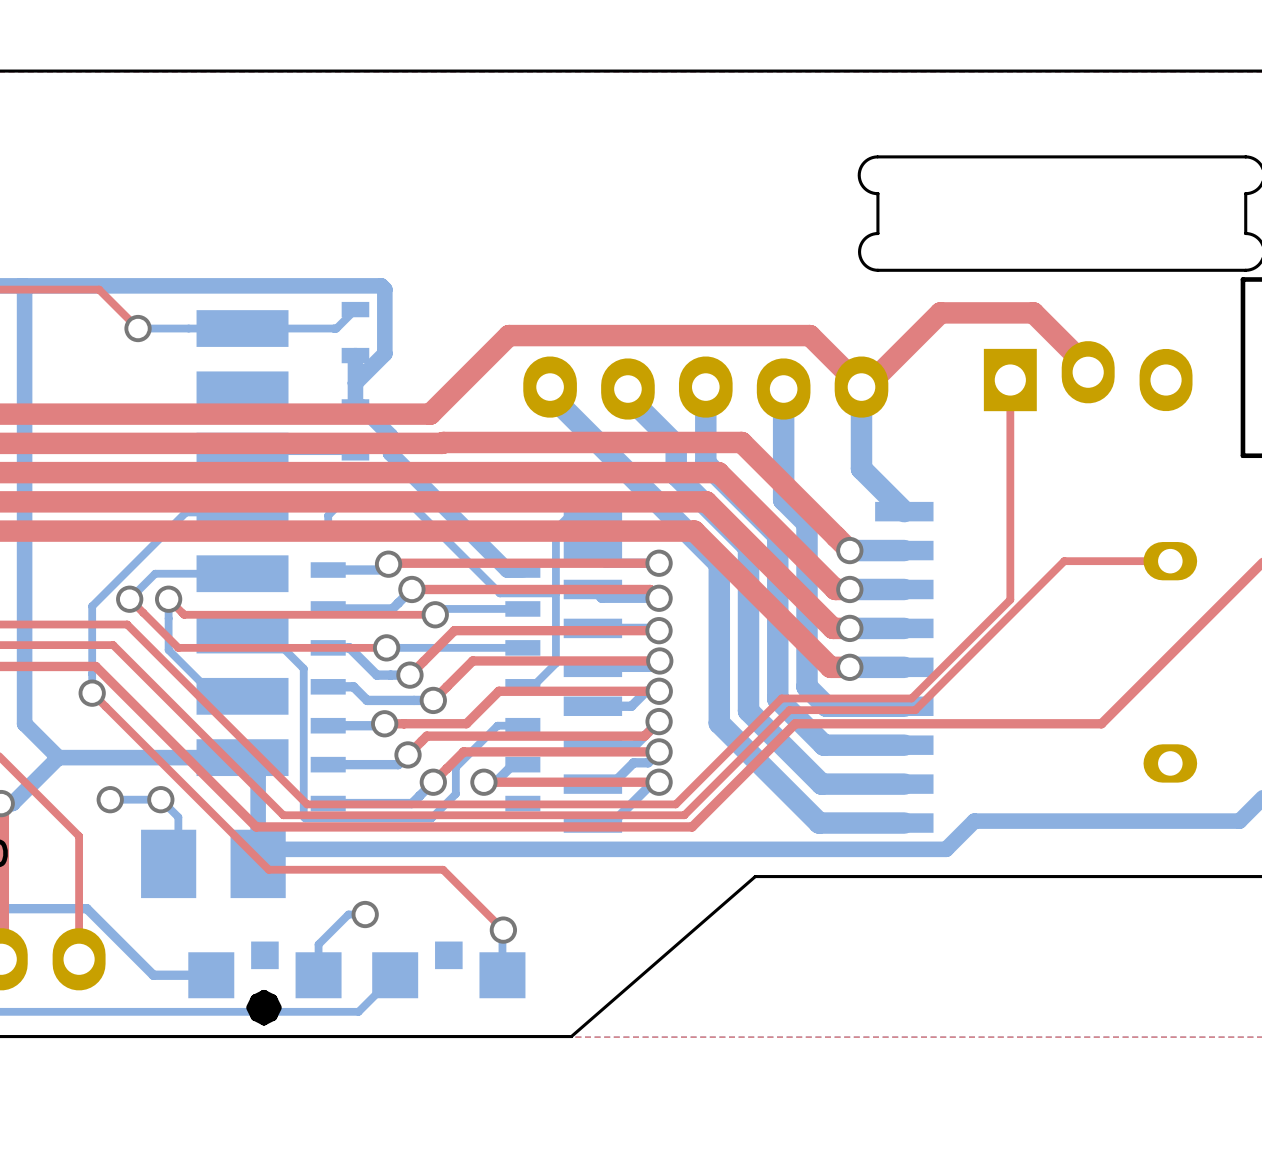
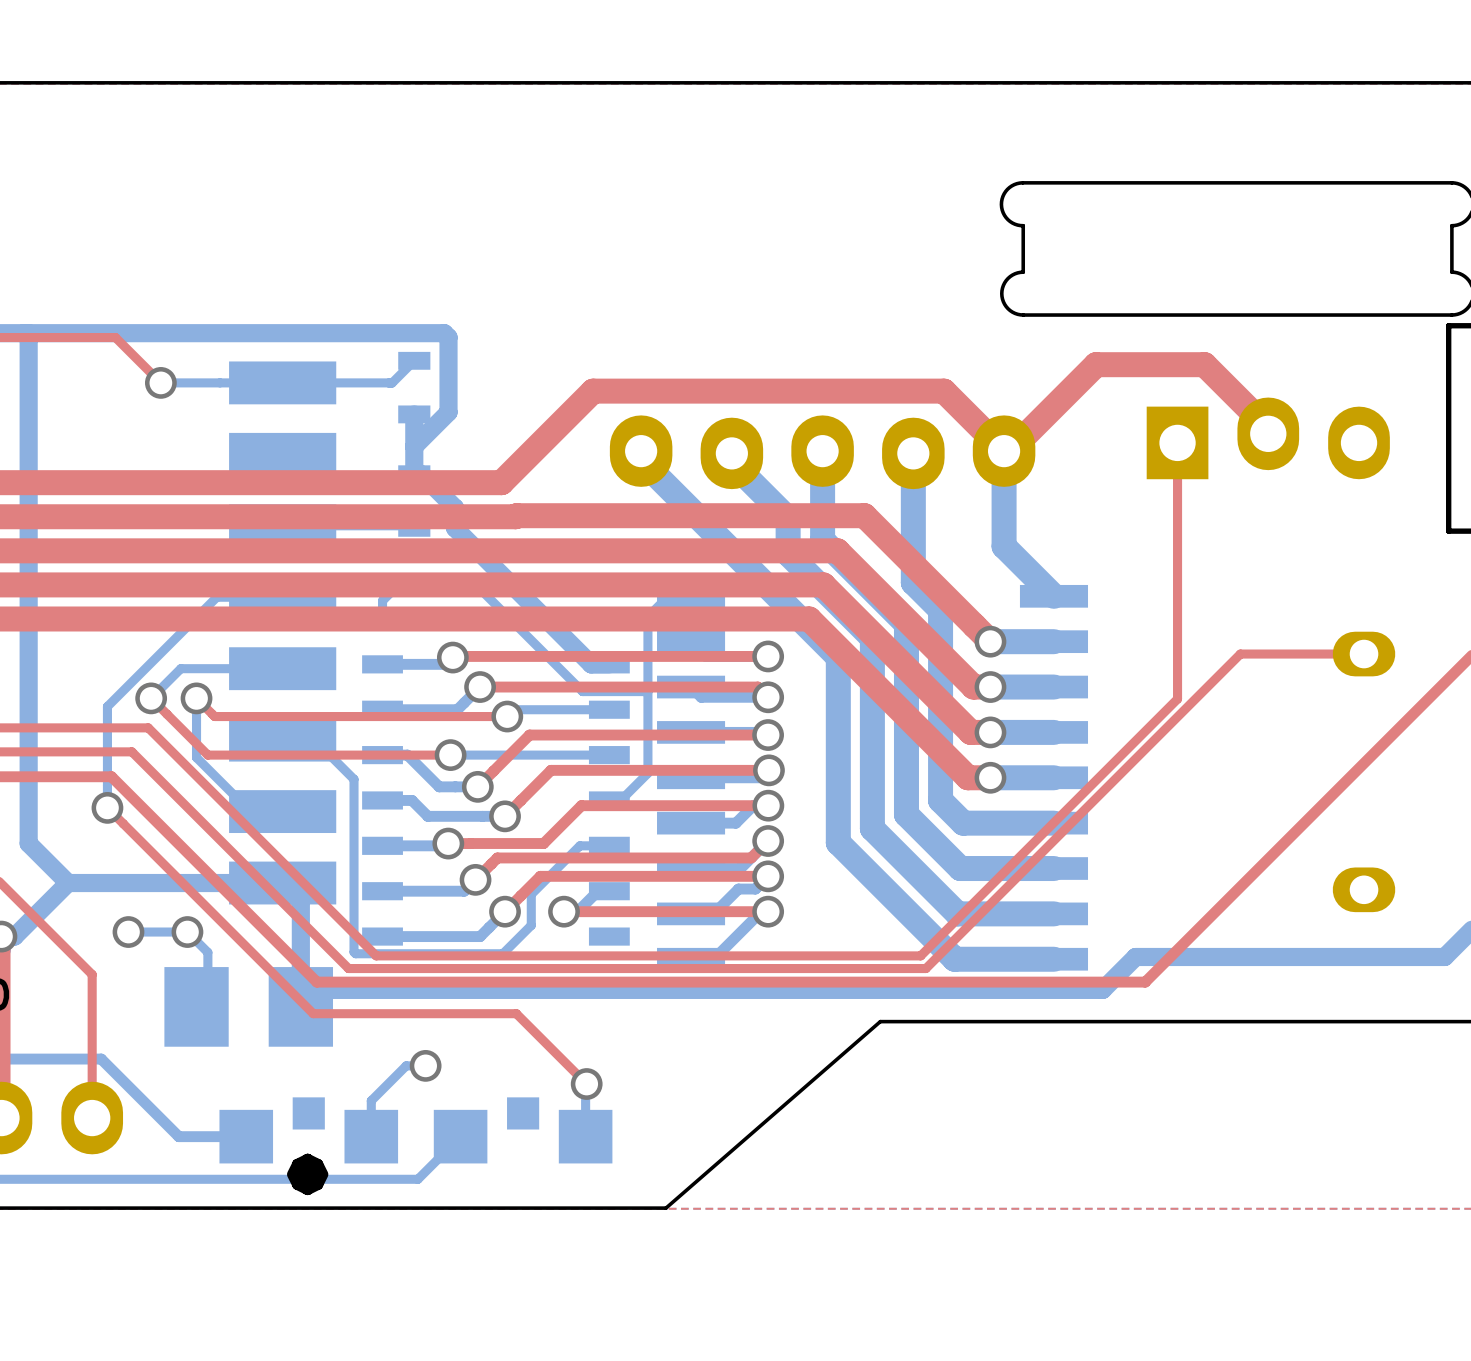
top track: (911, 698) (781, 698) (675, 804) (307, 804) -> (1062, 814) (920, 955) (376, 955) (357, 937)
top track: (915, 710) (789, 710) (684, 815) (283, 815) -> (1066, 827) (925, 968) (348, 968) (330, 950)
top track: (1101, 723) (795, 723) (692, 826) (256, 826) -> (1283, 843) (1145, 982) (316, 982) (298, 963)

